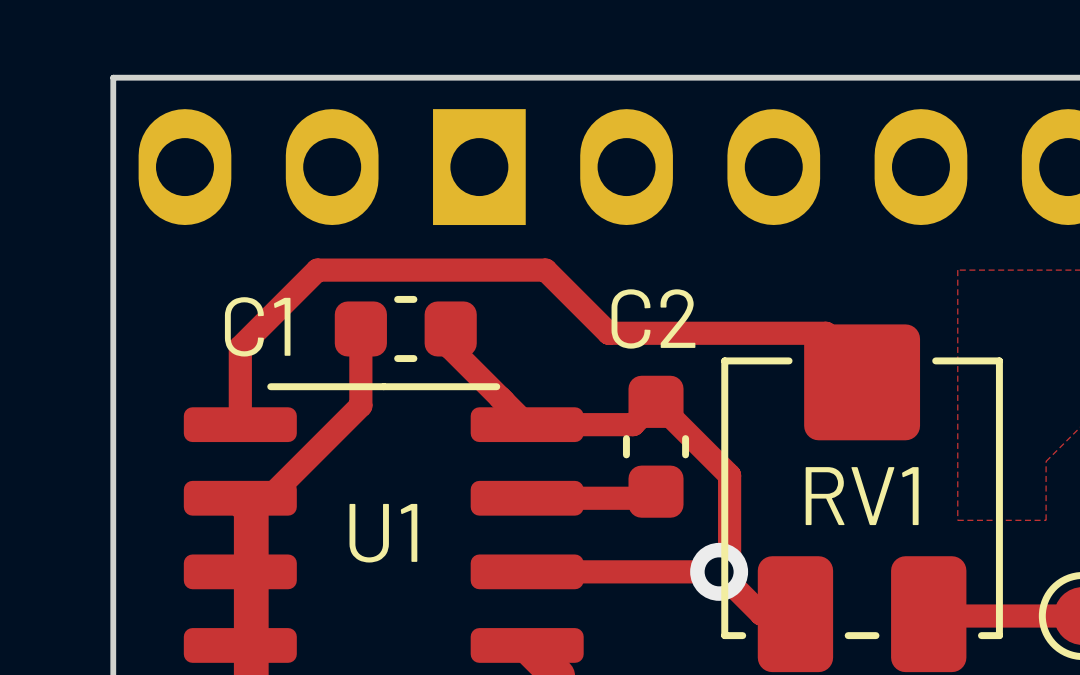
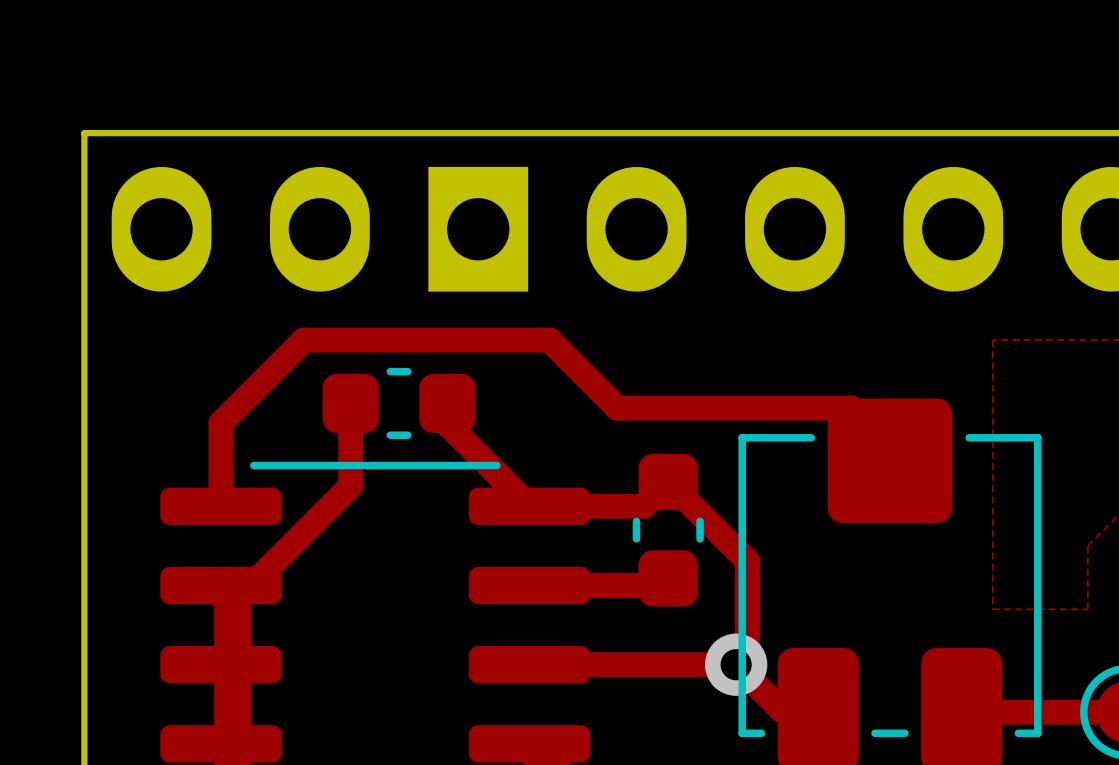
C2 name: C2 (653, 318) -> none
C1 name: C1 (257, 326) -> none
RV1 name: RV1 (862, 496) -> none
U1 name: U1 (383, 533) -> none

